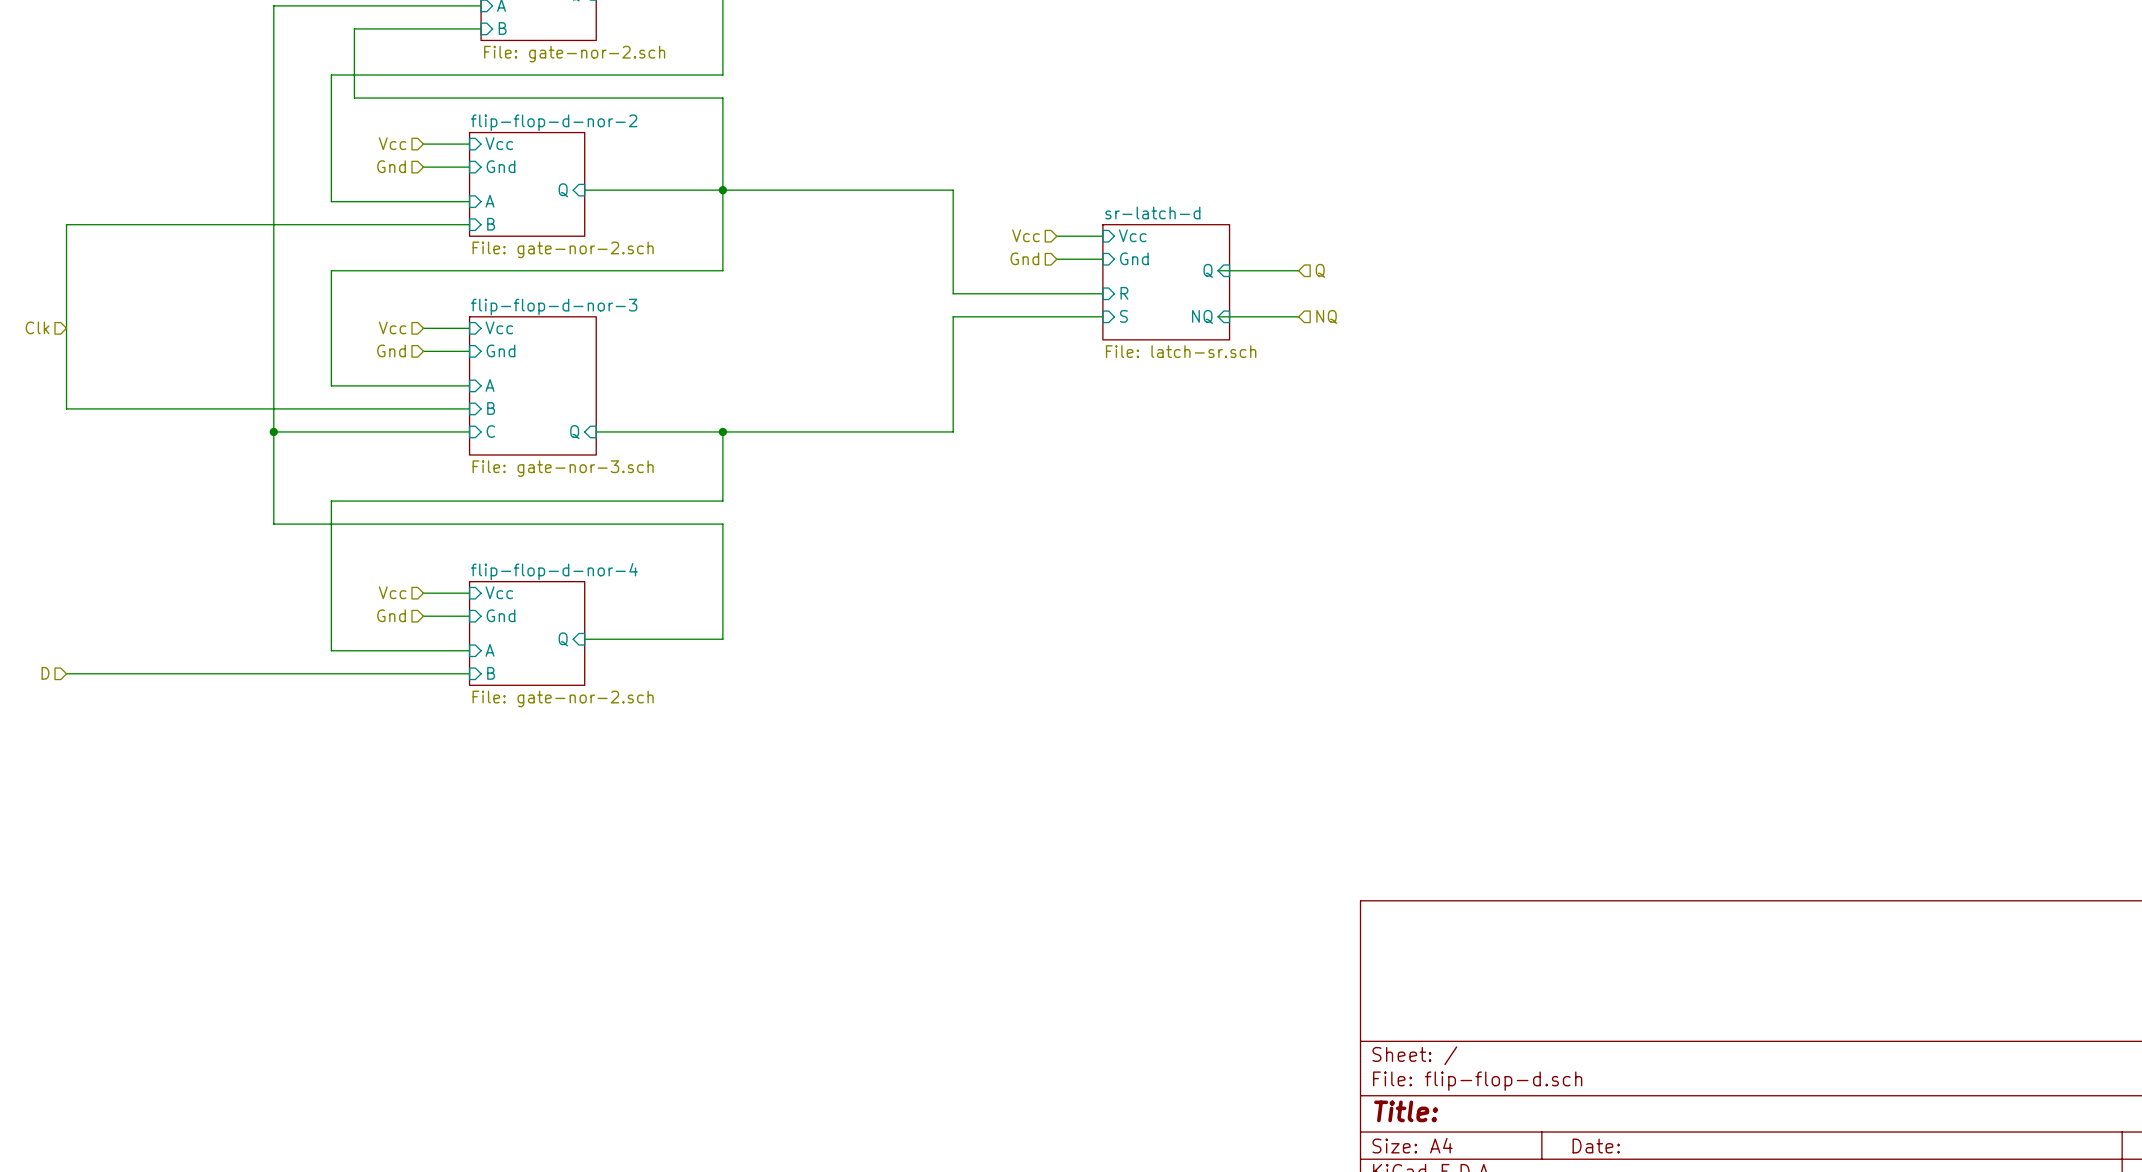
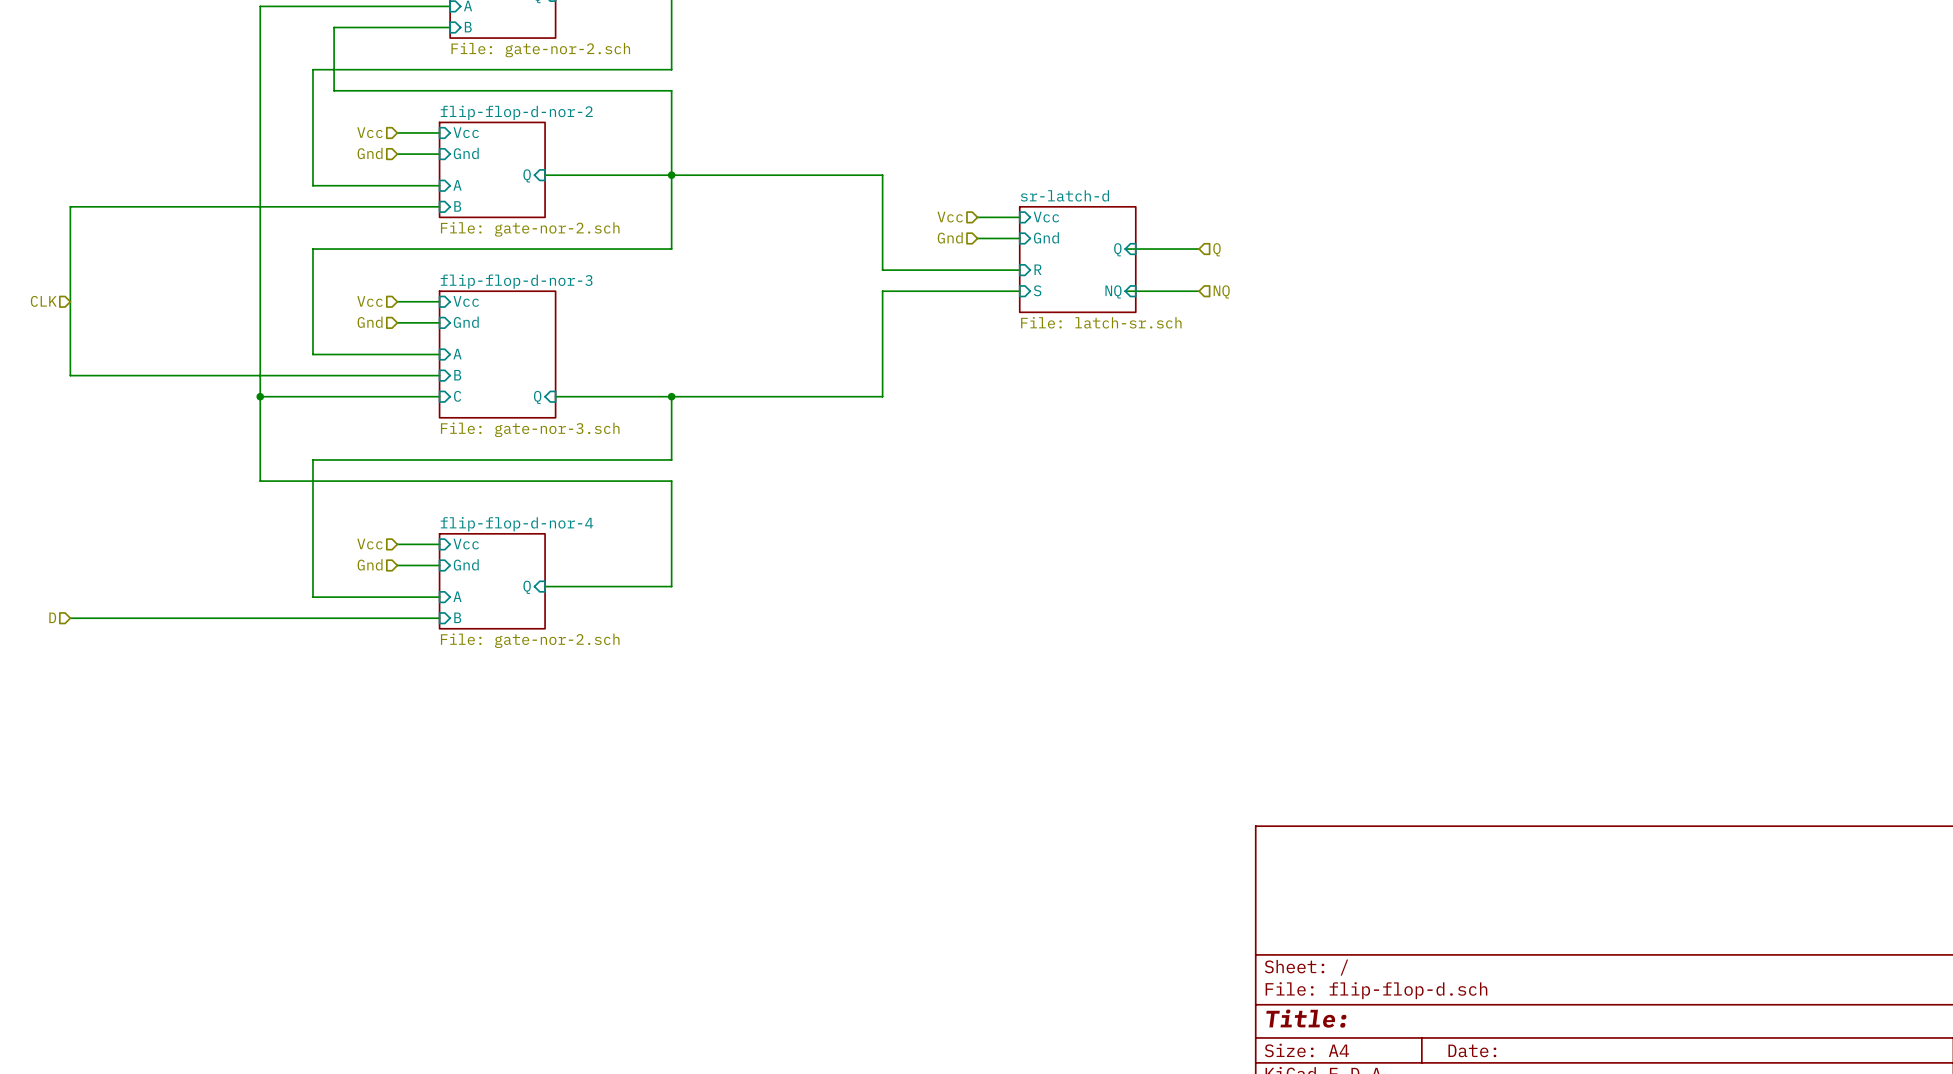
hierarchical label: Clk (37, 327) -> CLK (43, 301)

